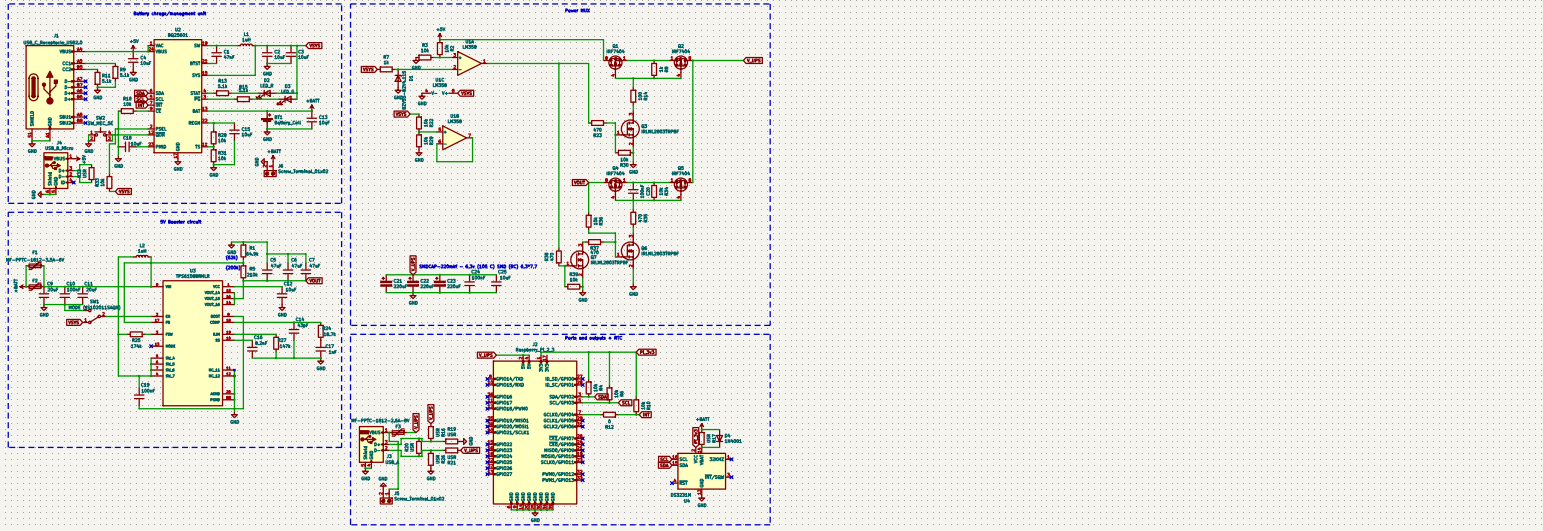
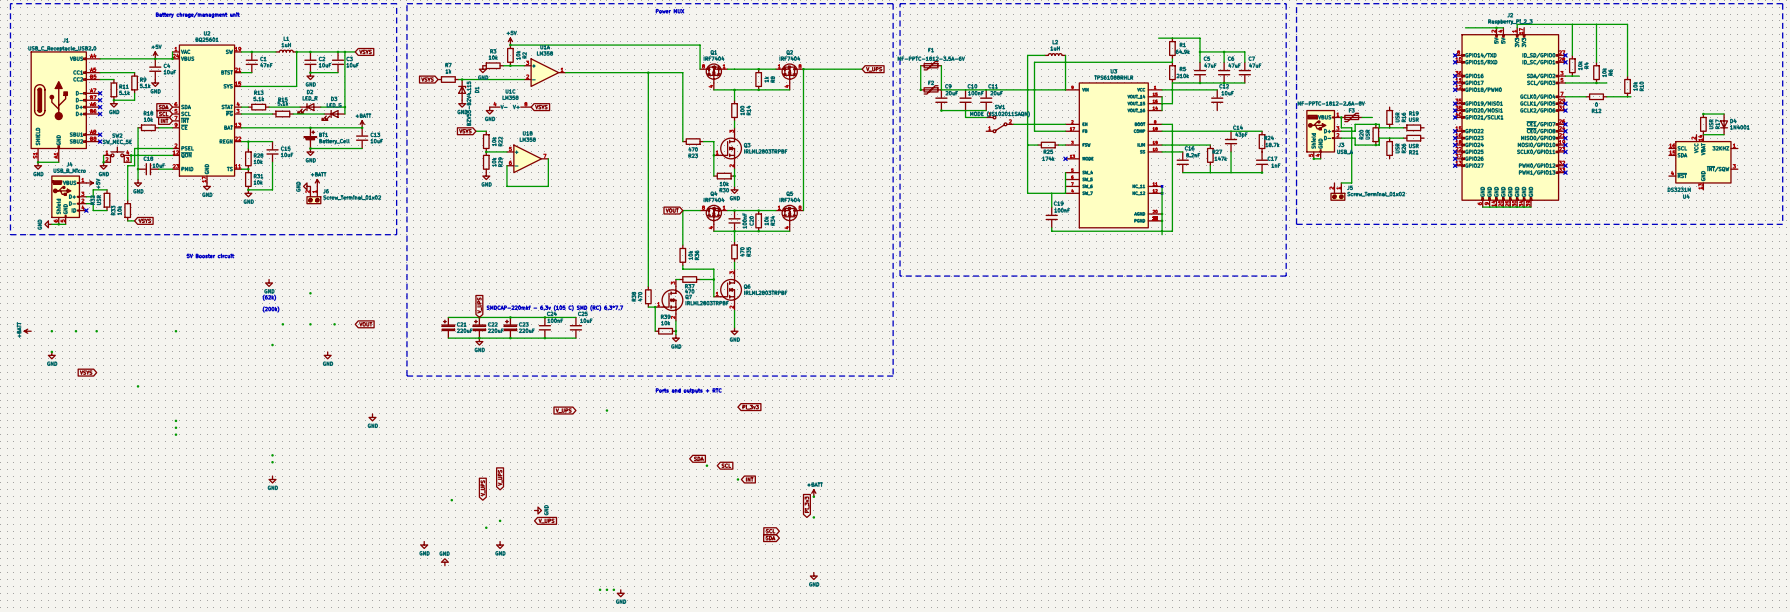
line: none -> (900, 3) (1286, 3) (1286, 276) (900, 276) (900, 3)
line: none -> (1296, 3) (1782, 3) (1782, 224) (1296, 224) (1296, 3)
wire: none -> (1572, 24) (1572, 55)
wire: none -> (1596, 24) (1596, 62)
wire: none -> (1465, 27) (1503, 27)
wire: none -> (1517, 27) (1517, 24) (1627, 24) (1627, 76)
wire: none -> (1158, 38) (1199, 38) (1199, 62)
wire: none -> (1199, 51) (1244, 51) (1244, 62)
wire: none -> (1224, 51) (1224, 62)
wire: none -> (1044, 55) (1027, 55) (1027, 193) (1065, 193) (1065, 172)
wire: none -> (1065, 55) (1065, 89) (941, 89) (941, 65)
no-connect mark: none -> (1455, 55)
no-connect mark: none -> (1565, 55)
wire: none -> (1172, 58) (1172, 62) (1034, 62) (1034, 131) (1065, 131)
no-connect mark: none -> (1455, 62)
no-connect mark: none -> (1565, 62)
wire: none -> (920, 65) (920, 89)
no-connect mark: none -> (1455, 76)
wire: none -> (1565, 76) (1579, 76)
wire: none -> (1244, 82) (1172, 82) (1172, 103) (1162, 103)
no-connect mark: none -> (1455, 82)
wire: none -> (1565, 82) (1606, 82)
junction: none -> (1596, 82)
junction: none -> (920, 89)
wire: none -> (1162, 89) (1217, 89)
no-connect mark: none -> (1455, 89)
wire: none -> (1162, 96) (1162, 110)
wire: none -> (1565, 96) (1586, 96)
wire: none -> (1606, 96) (1630, 96)
no-connect mark: none -> (1455, 103)
no-connect mark: none -> (1565, 103)
wire: none -> (941, 110) (986, 110)
junction: none -> (941, 110)
wire: none -> (965, 110) (965, 117) (986, 117)
no-connect mark: none -> (1455, 110)
no-connect mark: none -> (1565, 110)
wire: none -> (1703, 114) (1724, 114)
junction: none -> (1703, 114)
wire: none -> (1341, 117) (1341, 127) (1351, 127) (1351, 182) (1341, 182)
junction: none -> (1341, 117)
wire: none -> (1362, 117) (1372, 117)
no-connect mark: none -> (1455, 117)
wire: none -> (1013, 124) (1065, 124)
wire: none -> (1162, 124) (1172, 124) (1172, 231) (1051, 231) (1051, 227)
junction: none -> (1375, 124)
no-connect mark: none -> (1565, 124)
wire: none -> (1403, 127) (1379, 127) (1379, 124) (1355, 124) (1355, 131) (1341, 131)
wire: none -> (1162, 131) (1262, 131)
no-connect mark: none -> (1455, 131)
no-connect mark: none -> (1565, 131)
wire: none -> (1703, 134) (1724, 134)
wire: none -> (1341, 138) (1355, 138) (1355, 145) (1379, 145) (1379, 138) (1403, 138)
no-connect mark: none -> (1455, 138)
no-connect mark: none -> (1565, 138)
wire: none -> (1027, 145) (1037, 145)
wire: none -> (1058, 145) (1065, 145)
wire: none -> (1162, 145) (1210, 145)
no-connect mark: none -> (1455, 145)
no-connect mark: none -> (1565, 145)
wire: none -> (1162, 151) (1182, 151)
wire: none -> (1231, 151) (1231, 172)
no-connect mark: none -> (1455, 151)
no-connect mark: none -> (1565, 151)
no-connect mark: none -> (1065, 158)
wire: none -> (1313, 158) (1320, 158)
junction: none -> (1313, 158)
no-connect mark: none -> (1455, 158)
wire: none -> (1210, 165) (1210, 172)
no-connect mark: none -> (1455, 165)
no-connect mark: none -> (1565, 165)
wire: none -> (1182, 172) (1262, 172)
junction: none -> (1262, 172)
no-connect mark: none -> (1565, 172)
wire: none -> (1162, 186) (1162, 234)
wire: none -> (1051, 193) (1051, 207)
junction: none -> (1162, 193)
wire: none -> (1482, 207) (1530, 207)
line: (8, 212) (8, 447) (341, 447) (341, 212) (8, 212) -> none
wire: (231, 242) (267, 242) (267, 262) -> none
part position: (243, 250) -> (1172, 48)
wire: (267, 253) (305, 253) (305, 262) -> none
wire: (288, 253) (288, 262) -> none
wire: (133, 256) (118, 256) (118, 375) (151, 375) (151, 358) -> none
part position: (142, 256) -> (1055, 54)
wire: (151, 256) (151, 286) (43, 286) (43, 265) -> none
wire: (243, 259) (243, 262) (124, 262) (124, 322) (151, 322) -> none
wire: (26, 265) (26, 286) -> none
part position: (35, 265) -> (931, 65)
part position: (243, 271) -> (1172, 72)
part position: (267, 271) -> (1199, 72)
part position: (288, 271) -> (1224, 72)
part position: (305, 271) -> (1244, 72)
wire: (305, 280) (243, 280) (243, 298) (234, 298) -> none
junction: (26, 286) -> none
part position: (35, 286) -> (931, 89)
wire: (234, 286) (282, 286) -> none
wire: (234, 292) (234, 304) -> none
part position: (43, 295) -> (941, 100)
part position: (64, 295) -> (965, 100)
part position: (82, 295) -> (986, 100)
part position: (282, 295) -> (1217, 100)
wire: (43, 304) (82, 304) -> none
wire: (64, 304) (64, 310) (82, 310) -> none
part position: (94, 316) -> (1000, 124)
wire: (106, 316) (151, 316) -> none
wire: (234, 316) (243, 316) (243, 408) (139, 408) (139, 405) -> none
wire: (234, 322) (320, 322) -> none
part position: (293, 331) -> (1231, 141)
part position: (320, 331) -> (1262, 141)
wire: (118, 334) (127, 334) -> none
part position: (136, 334) -> (1048, 145)
wire: (145, 334) (151, 334) -> none
wire: (234, 334) (276, 334) -> none
line: (350, 334) (350, 524) (770, 524) (770, 334) (350, 334) -> none
wire: (234, 340) (252, 340) -> none
wire: (293, 340) (293, 358) -> none
part position: (193, 343) -> (1114, 155)
part position: (276, 343) -> (1210, 155)
no-connect mark: (151, 346) -> none
part position: (252, 349) -> (1182, 162)
part position: (320, 349) -> (1262, 162)
wire: (276, 352) (276, 358) -> none
wire: (588, 352) (588, 378) -> none
wire: (609, 352) (609, 384) -> none
wire: (496, 355) (529, 355) -> none
wire: (541, 355) (541, 352) (636, 352) (636, 396) -> none
wire: (252, 358) (320, 358) -> none
junction: (320, 358) -> none
wire: (234, 370) (234, 411) -> none
wire: (139, 375) (139, 387) -> none
junction: (234, 375) -> none
no-connect mark: (487, 378) -> none
no-connect mark: (582, 378) -> none
no-connect mark: (487, 384) -> none
no-connect mark: (582, 384) -> none
part position: (588, 387) -> (1572, 65)
part position: (609, 393) -> (1596, 72)
part position: (139, 396) -> (1051, 217)
no-connect mark: (487, 396) -> none
wire: (582, 396) (594, 396) -> none
no-connect mark: (487, 402) -> none
wire: (582, 402) (618, 402) -> none
part position: (636, 405) -> (1627, 86)
no-connect mark: (487, 408) -> none
wire: (582, 414) (600, 414) -> none
part position: (609, 414) -> (1596, 96)
wire: (618, 414) (639, 414) -> none
no-connect mark: (487, 420) -> none
no-connect mark: (582, 420) -> none
no-connect mark: (487, 426) -> none
no-connect mark: (582, 426) -> none
wire: (701, 429) (719, 429) -> none
wire: (389, 432) (389, 441) (398, 441) (398, 489) (389, 489) -> none
part position: (398, 432) -> (1351, 117)
wire: (407, 432) (416, 432) -> none
part position: (430, 432) -> (1389, 117)
no-connect mark: (487, 432) -> none
part position: (535, 432) -> (1510, 117)
no-connect mark: (582, 438) -> none
part position: (701, 438) -> (1703, 124)
part position: (719, 438) -> (1724, 124)
wire: (442, 441) (401, 438) (401, 444) (389, 444) -> none
part position: (451, 441) -> (1413, 127)
no-connect mark: (487, 444) -> none
no-connect mark: (582, 444) -> none
part position: (374, 447) -> (1323, 134)
part position: (418, 447) -> (1375, 134)
wire: (701, 447) (719, 447) -> none
wire: (389, 450) (401, 450) (401, 456) (421, 456) (421, 450) (442, 450) -> none
part position: (451, 450) -> (1413, 138)
no-connect mark: (487, 450) -> none
no-connect mark: (582, 450) -> none
no-connect mark: (487, 456) -> none
no-connect mark: (582, 456) -> none
part position: (430, 459) -> (1389, 148)
no-connect mark: (731, 459) -> none
no-connect mark: (487, 462) -> none
no-connect mark: (582, 462) -> none
wire: (365, 468) (371, 468) -> none
junction: (365, 468) -> none
no-connect mark: (487, 468) -> none
part position: (701, 471) -> (1703, 162)
no-connect mark: (487, 474) -> none
no-connect mark: (582, 474) -> none
no-connect mark: (731, 477) -> none
no-connect mark: (582, 480) -> none
no-connect mark: (671, 483) -> none
part position: (386, 496) -> (1337, 191)
wire: (511, 509) (552, 509) -> none

